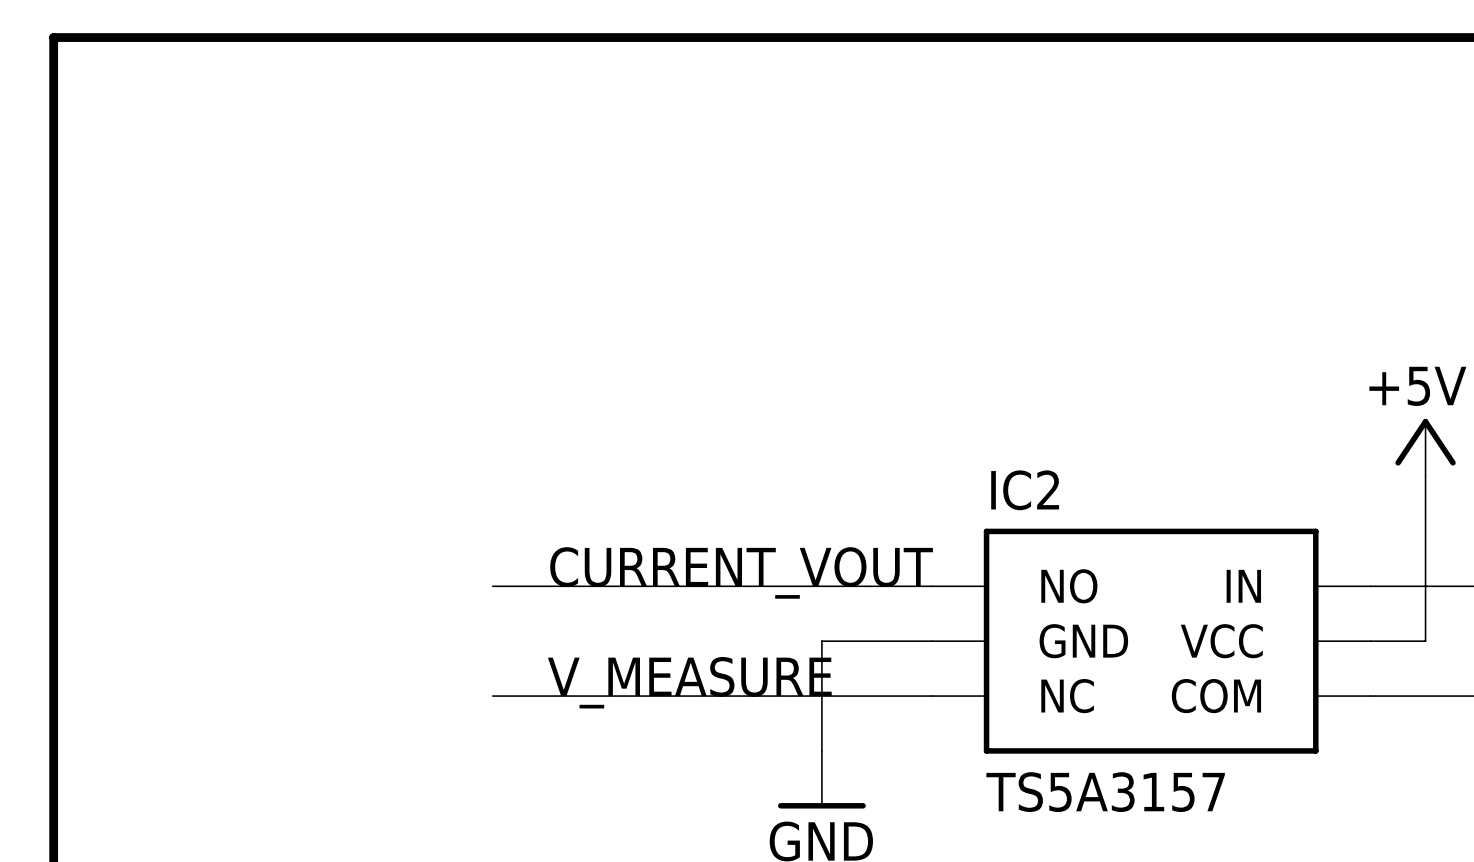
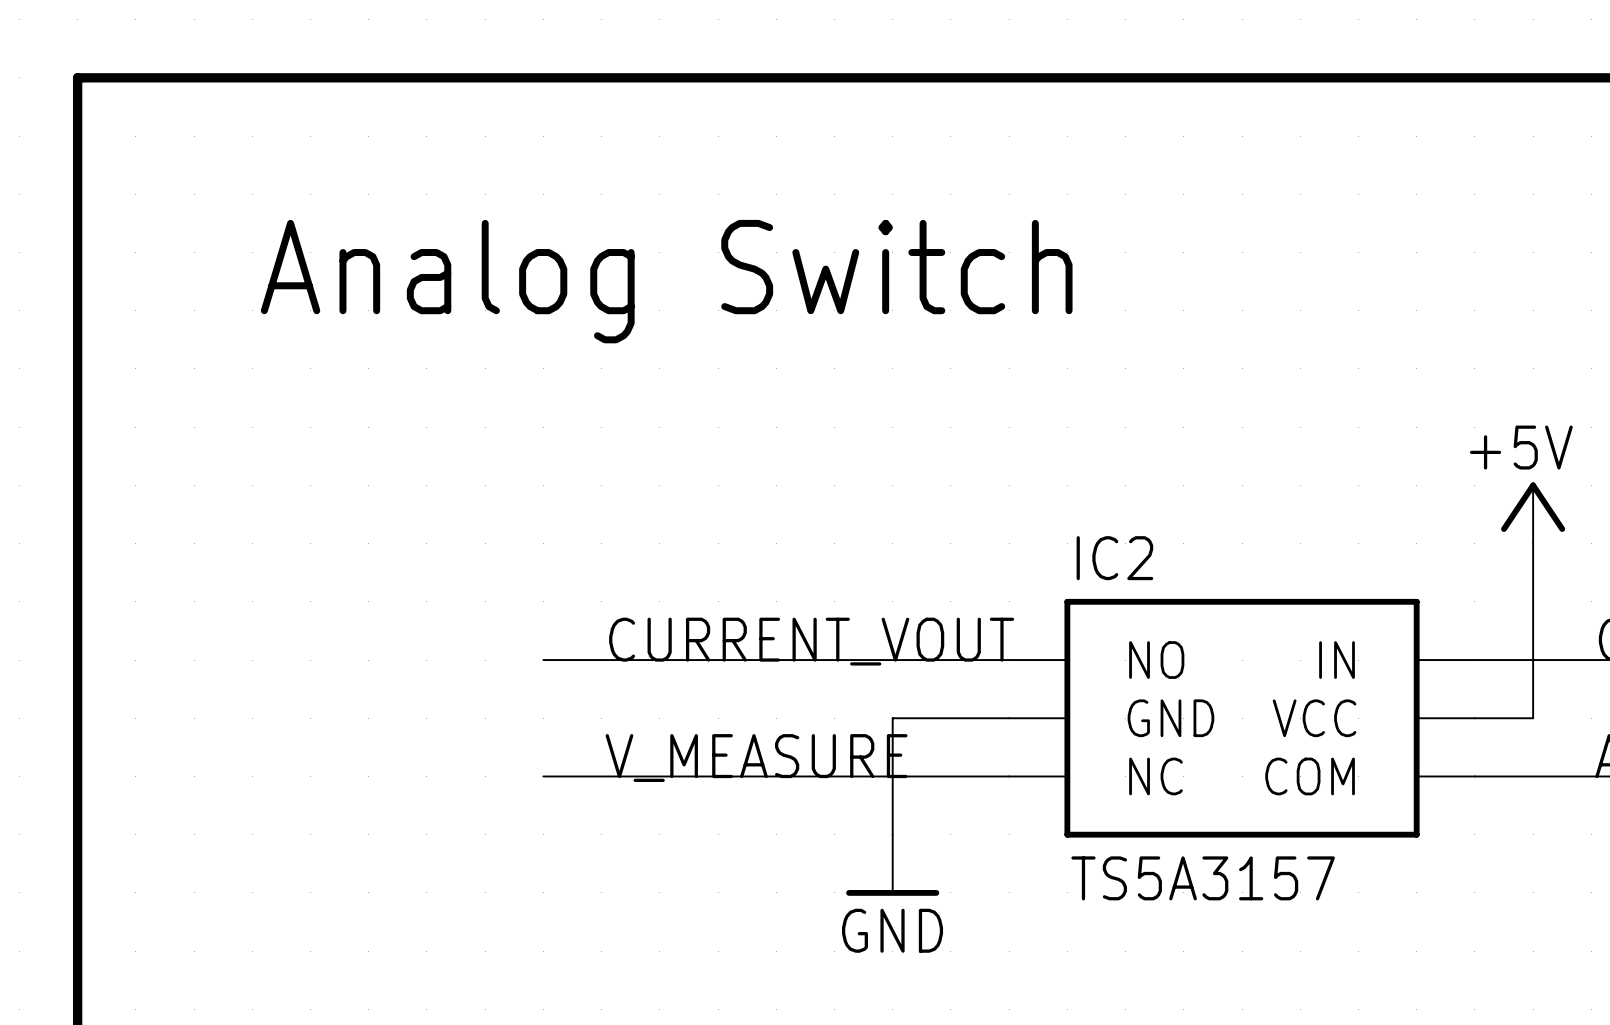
text: none -> Analog Switch (666, 281)

